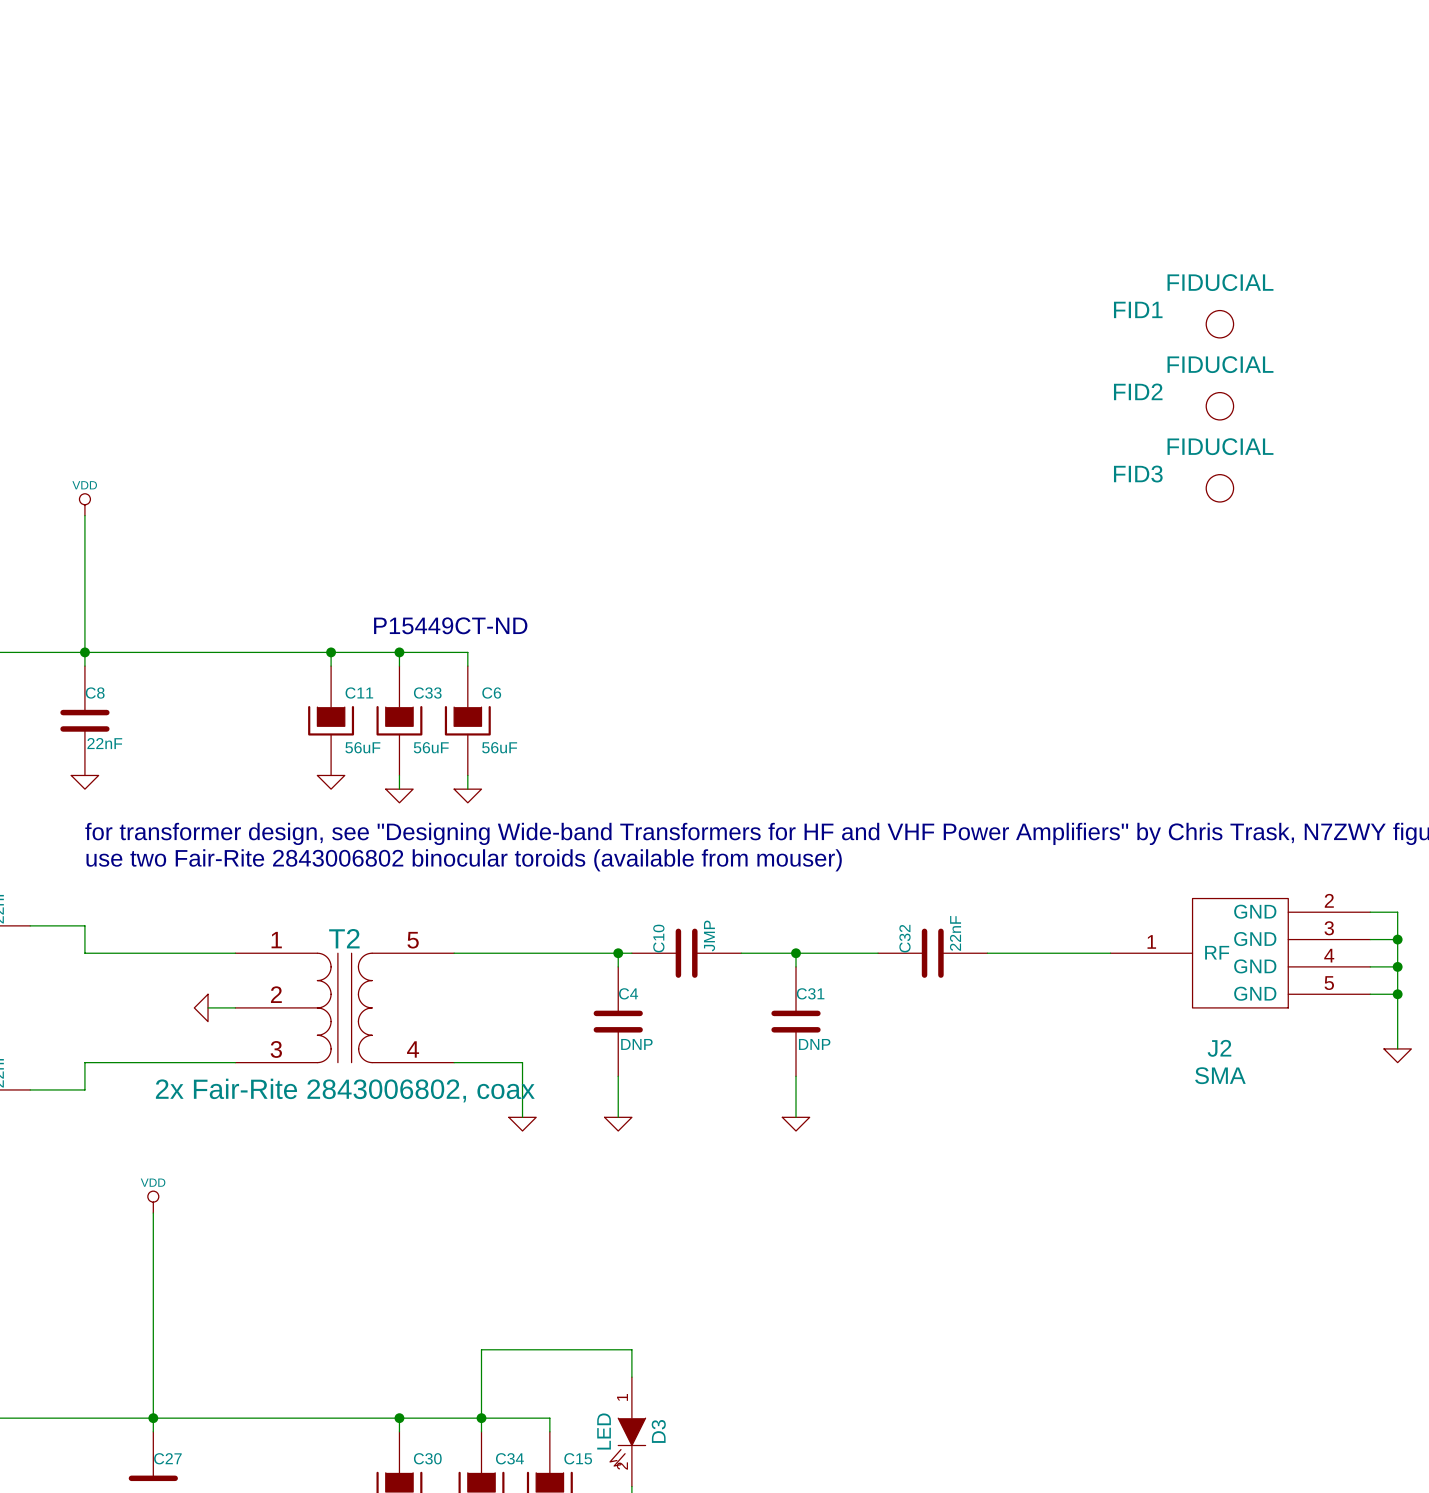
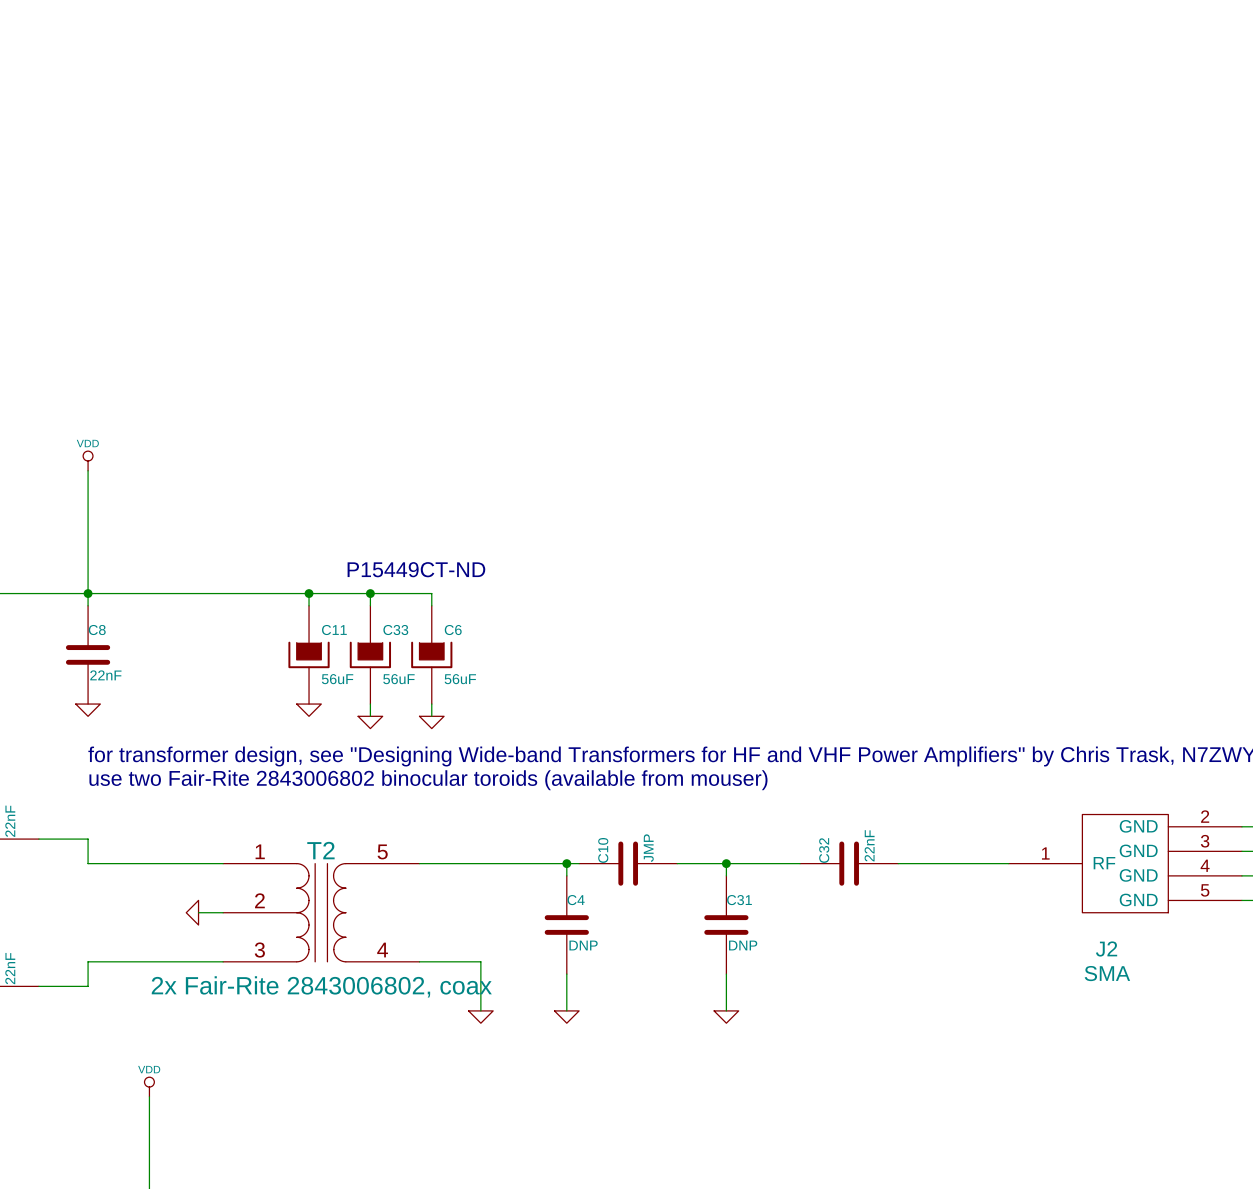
FID1: FIDUCIAL (1219, 324) -> none
FID2: FIDUCIAL (1219, 406) -> none
FID3: FIDUCIAL (1219, 488) -> none

